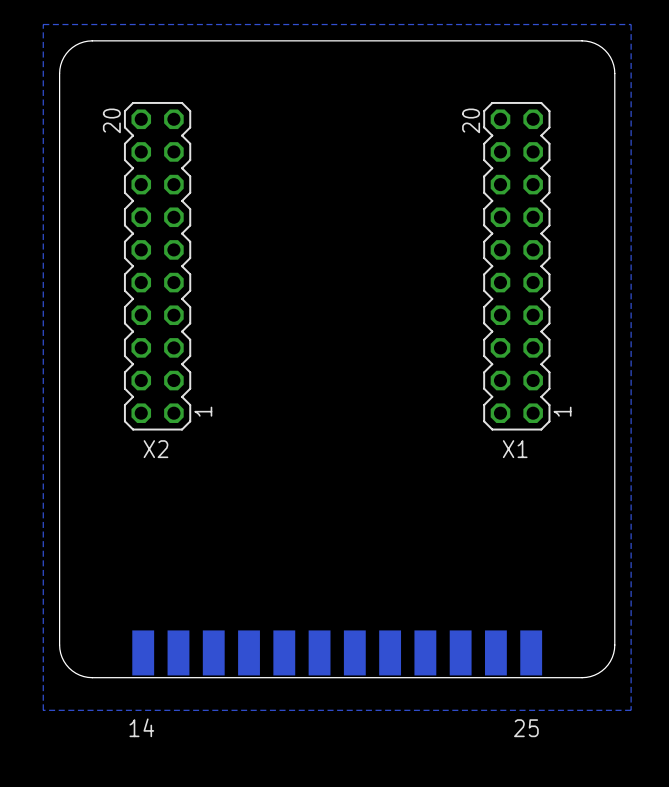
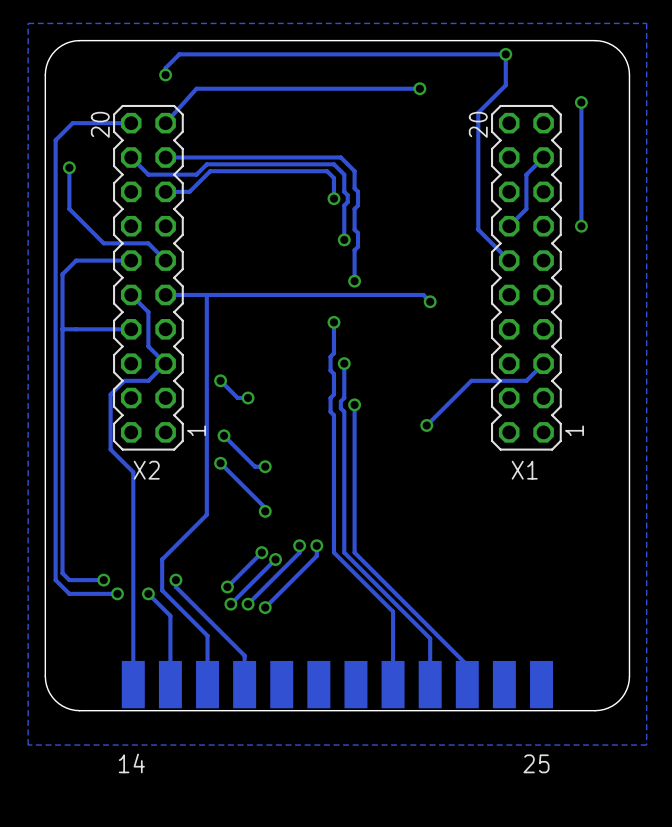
via: none -> (505, 54)
track: none -> (165, 74) (165, 68) (179, 54) (505, 54) (505, 85) (478, 112) (478, 229) (509, 260)
via: none -> (165, 74)
track: none -> (419, 88) (196, 88) (165, 123)
via: none -> (419, 88)
track: none -> (581, 102) (581, 226)
via: none -> (581, 102)
track: none -> (131, 123) (72, 123) (55, 140) (55, 580) (69, 593) (117, 593)
track: none -> (131, 157) (148, 174) (196, 174) (206, 164) (333, 164) (344, 174) (344, 191) (347, 195) (347, 202) (344, 205) (344, 239)
track: none -> (165, 157) (340, 157) (354, 171) (354, 188) (358, 191) (358, 205) (354, 208) (354, 229) (358, 233) (358, 246) (354, 250) (354, 281)
track: none -> (543, 157) (526, 174) (526, 209) (509, 226)
track: none -> (69, 167) (69, 208) (103, 243) (148, 243) (165, 260)
via: none -> (69, 167)
track: none -> (165, 191) (189, 191) (210, 171) (327, 171) (333, 178) (333, 198)
via: none -> (333, 198)
via: none -> (581, 226)
via: none -> (344, 239)
track: none -> (131, 260) (76, 260) (62, 274) (62, 573) (69, 580) (103, 580)
via: none -> (354, 281)
track: none -> (131, 294) (148, 312) (148, 346) (165, 363) (148, 380) (124, 380) (110, 394) (110, 449) (133, 472) (133, 684)
track: none -> (165, 294) (423, 294) (430, 301)
track: none -> (206, 294) (206, 514) (162, 559) (162, 590) (207, 635) (207, 684)
via: none -> (430, 301)
track: none -> (333, 322) (333, 353) (330, 356) (330, 370) (333, 373) (333, 394) (330, 397) (330, 411) (333, 415) (333, 552) (393, 611) (393, 684)
via: none -> (333, 322)
track: none -> (131, 329) (62, 329)
track: none -> (344, 363) (344, 397) (340, 401) (340, 408) (344, 411) (344, 552) (430, 638) (430, 684)
via: none -> (344, 363)
track: none -> (543, 363) (526, 380) (471, 380) (426, 425)
track: none -> (220, 380) (237, 397) (248, 397)
via: none -> (220, 380)
via: none -> (248, 397)
track: none -> (354, 404) (354, 552) (467, 665) (467, 684)
via: none -> (354, 404)
via: none -> (426, 425)
track: none -> (224, 435) (254, 466) (265, 466)
via: none -> (224, 435)
track: none -> (220, 463) (265, 507) (265, 511)
via: none -> (220, 463)
via: none -> (265, 466)
via: none -> (265, 511)
track: none -> (299, 545) (299, 552) (248, 604)
via: none -> (299, 545)
track: none -> (316, 545) (316, 556) (265, 607)
via: none -> (316, 545)
track: none -> (261, 552) (227, 586)
via: none -> (261, 552)
track: none -> (275, 559) (230, 604)
via: none -> (275, 559)
via: none -> (103, 580)
track: none -> (175, 580) (175, 586) (244, 655) (244, 684)
via: none -> (175, 580)
via: none -> (227, 586)
via: none -> (117, 593)
track: none -> (148, 593) (170, 615) (170, 684)
via: none -> (148, 593)
via: none -> (230, 604)
via: none -> (248, 604)
via: none -> (265, 607)

